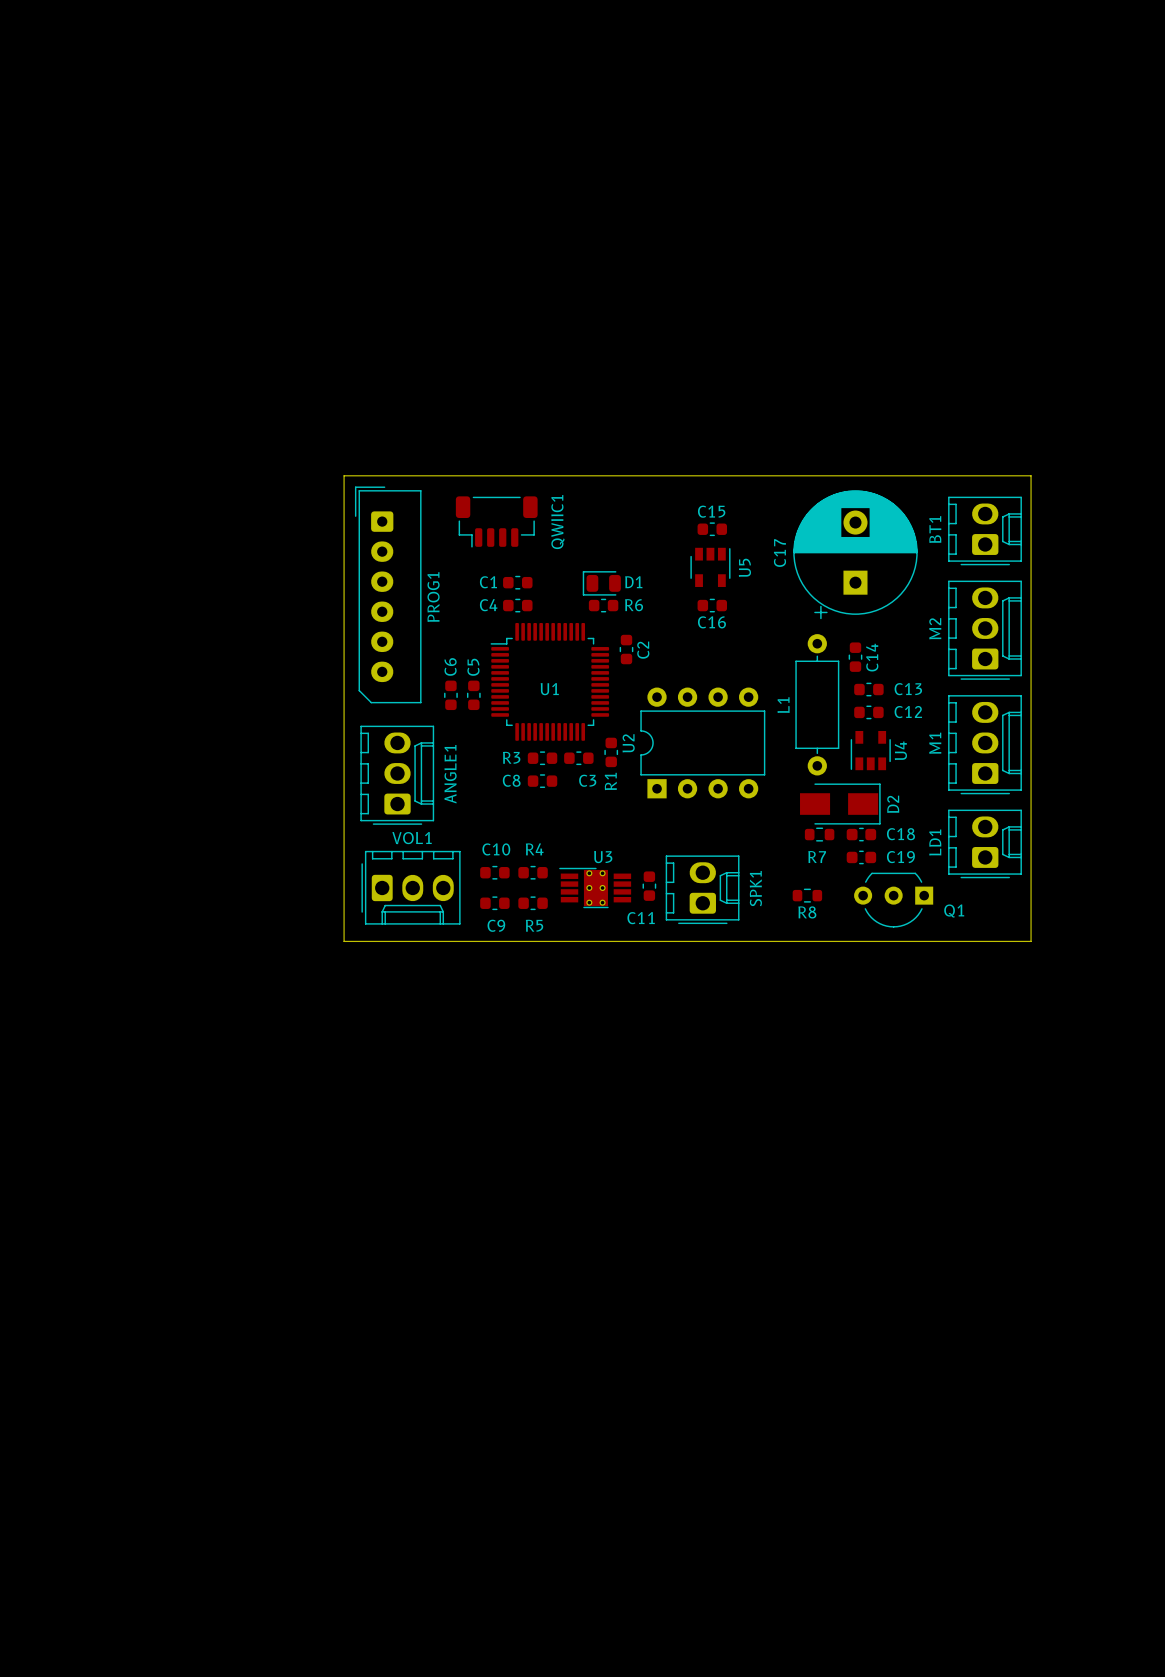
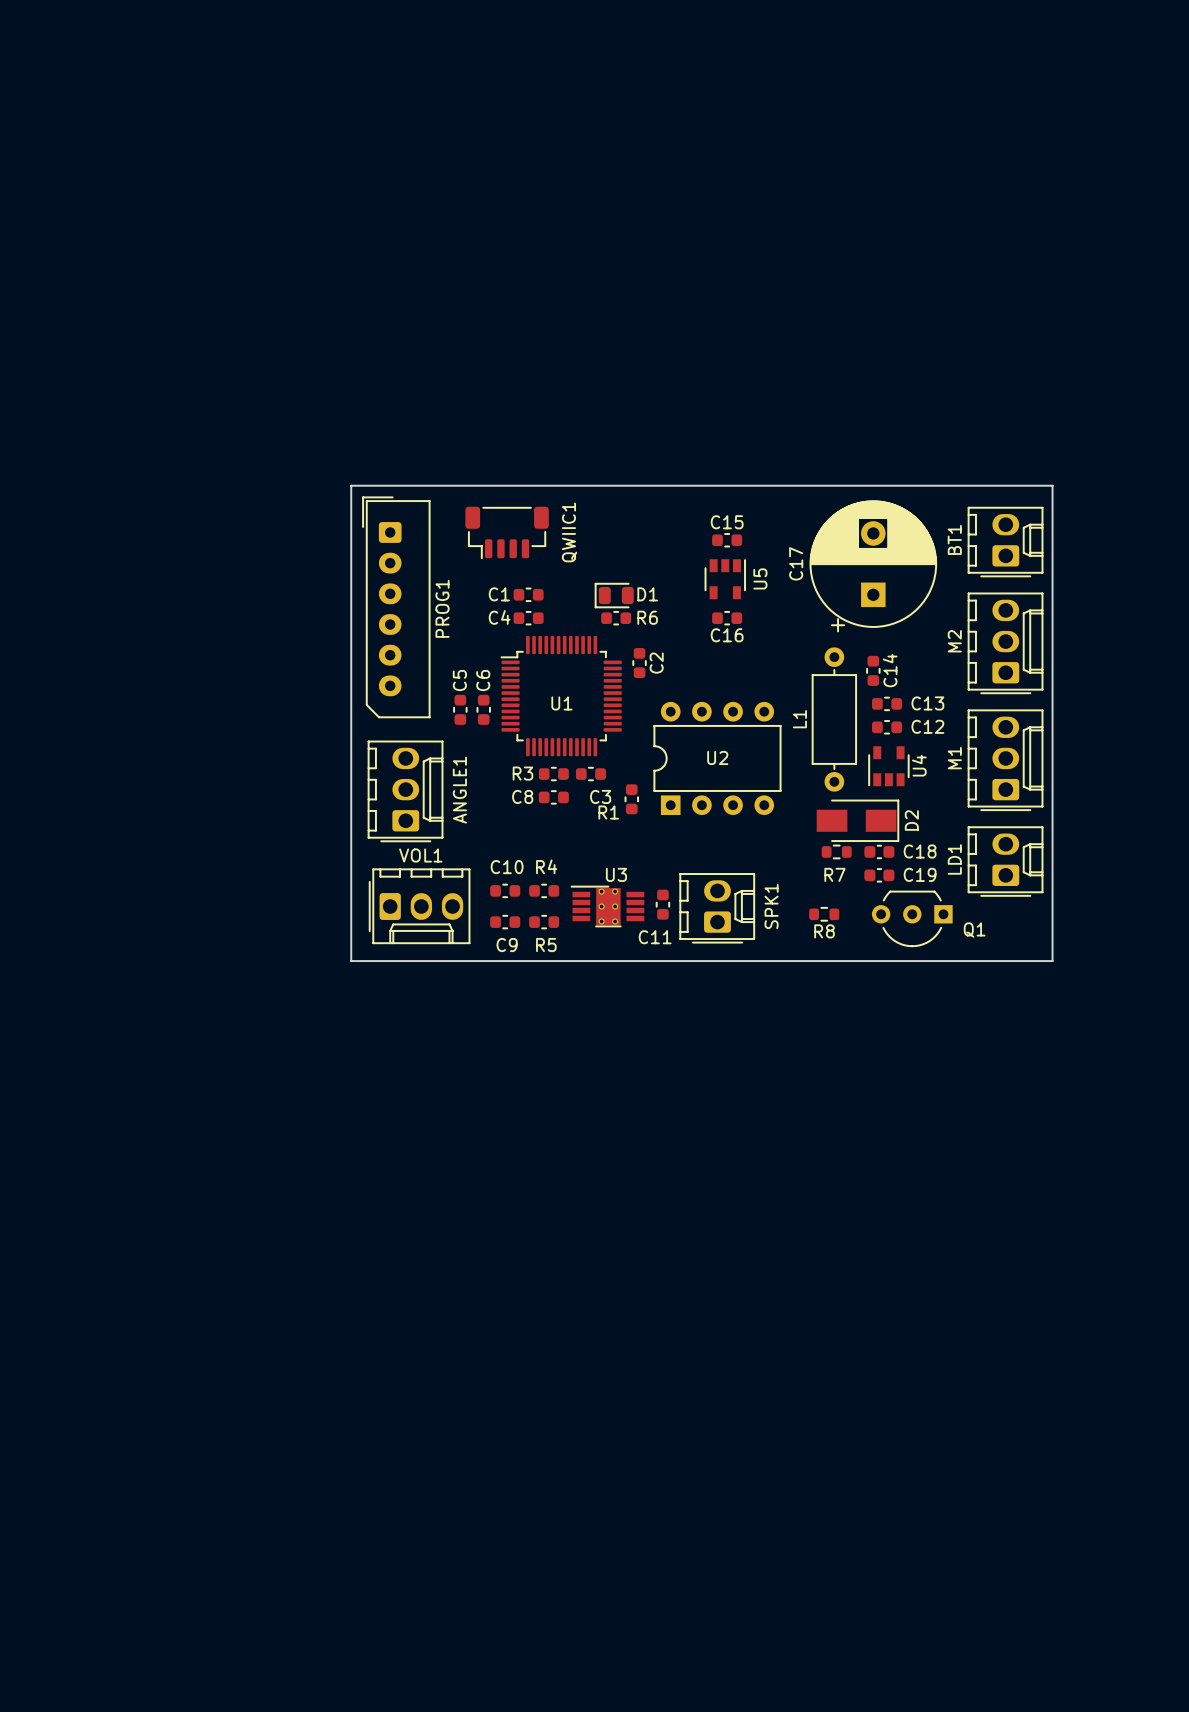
C6 name: C6 (450, 666) -> C5 (459, 680)
C5 name: C5 (473, 667) -> C6 (483, 680)
U2 name rotation: 0° (628, 743) -> 90° clockwise (717, 757)
U2 name position: U2 (628, 743) -> U2 (717, 757)
R1 position: (611, 752) -> (631, 799)
R1 name rotation: 0° (610, 781) -> 90° clockwise (608, 812)

